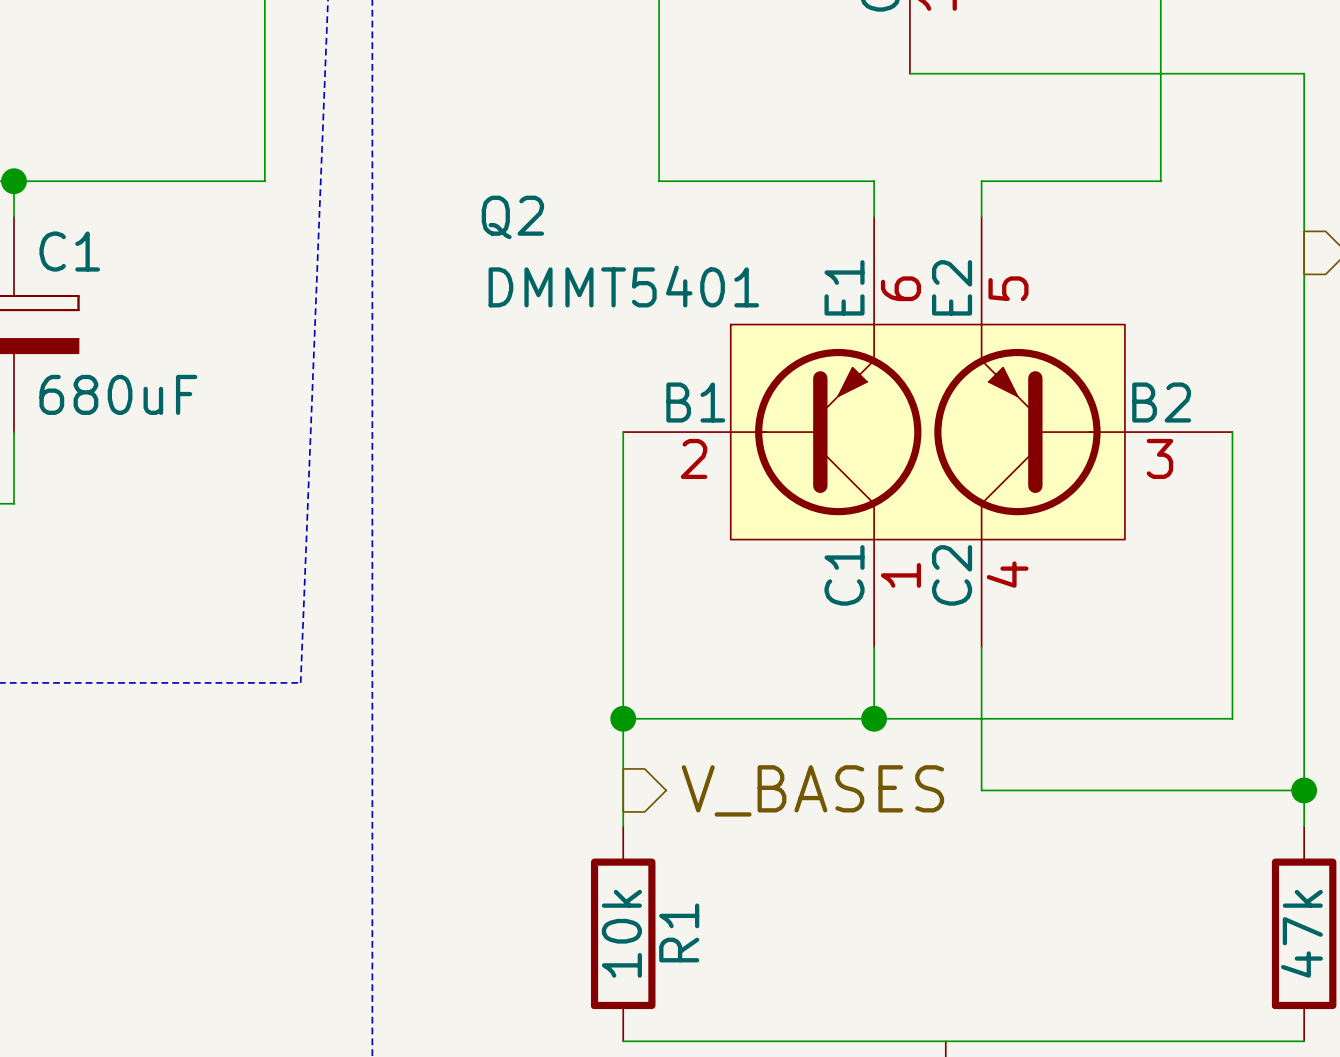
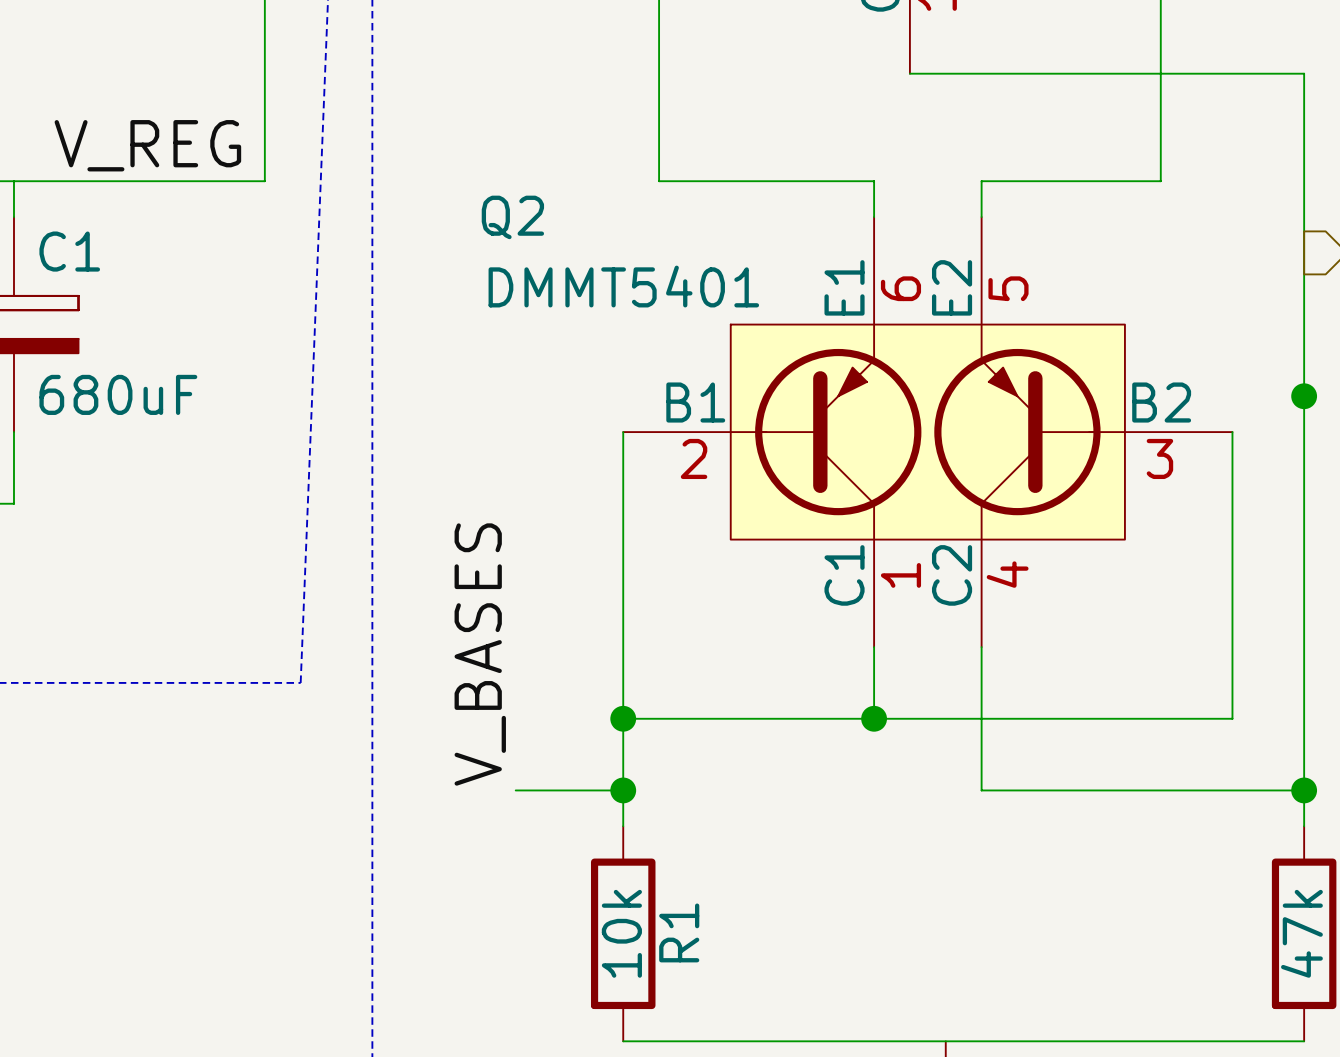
label: none -> V_REG (147, 145)
junction: (13, 181) -> none
junction: none -> (1304, 396)
label: none -> V_BASES (480, 654)
wire: none -> (515, 790) (623, 790)
junction: none -> (623, 790)
hierarchical label: V_BASES (812, 790) -> none

